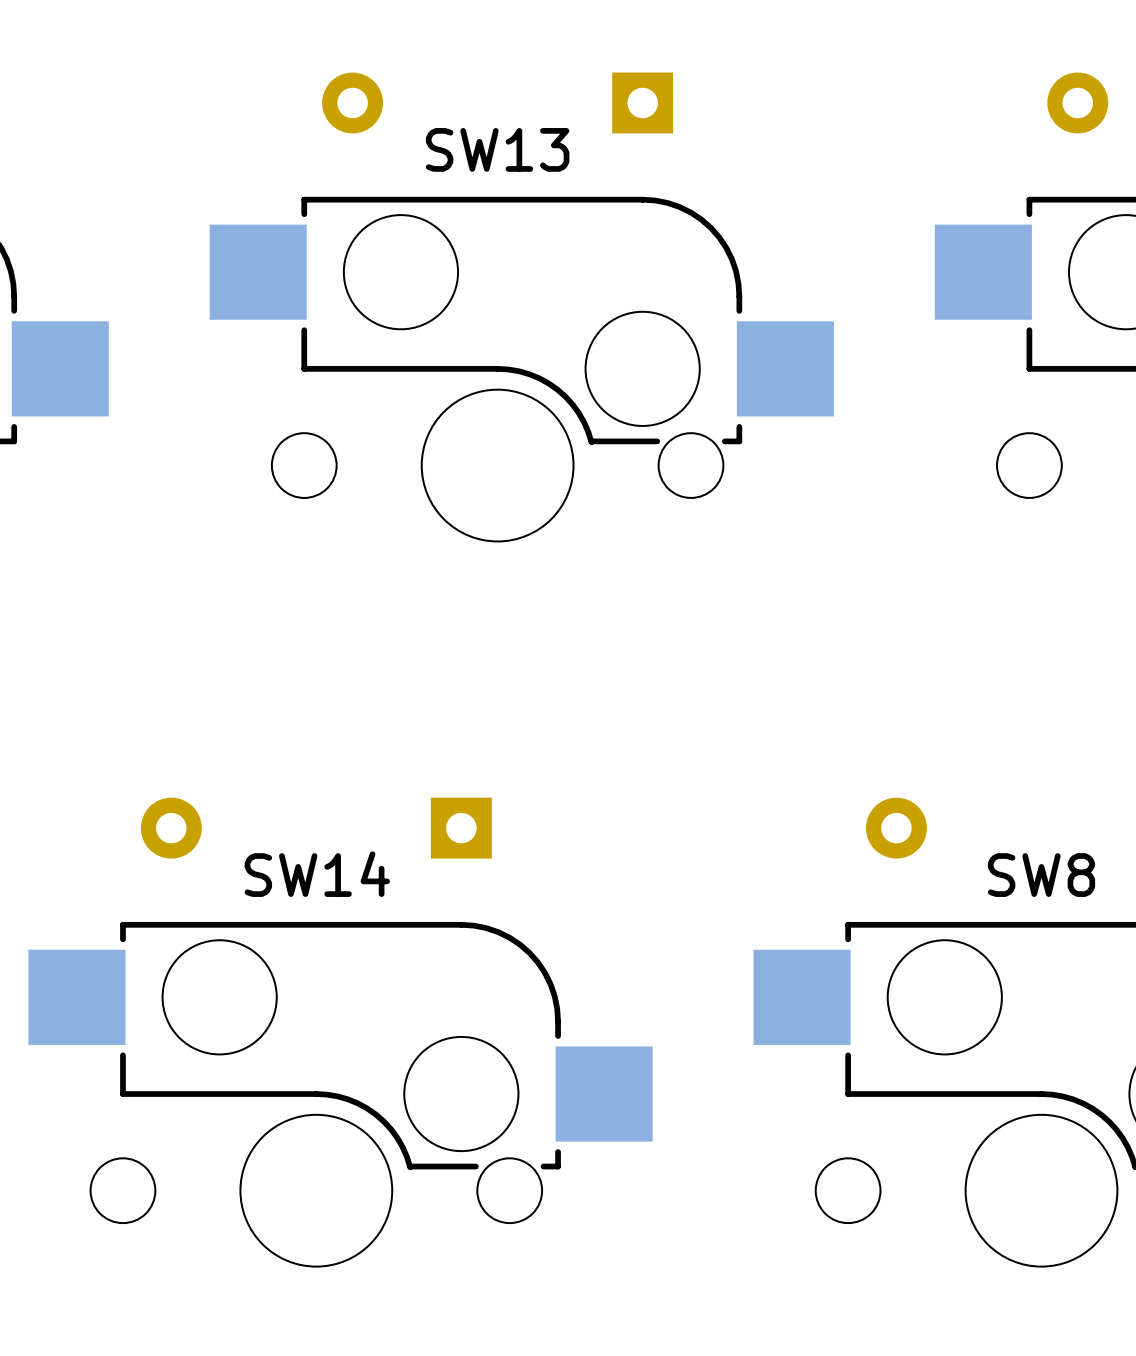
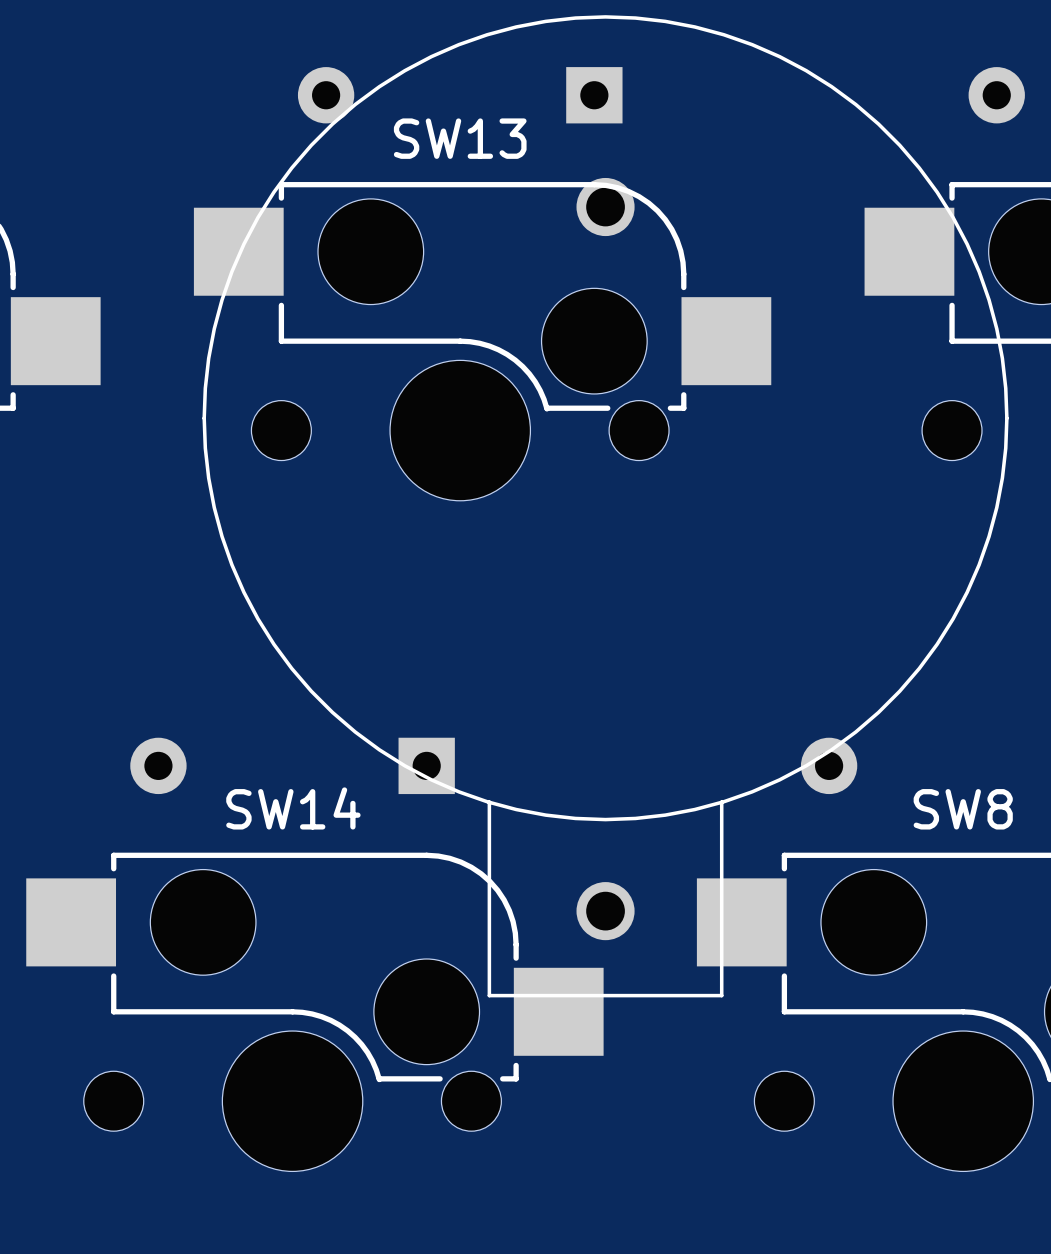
part: none -> (605, 506)

